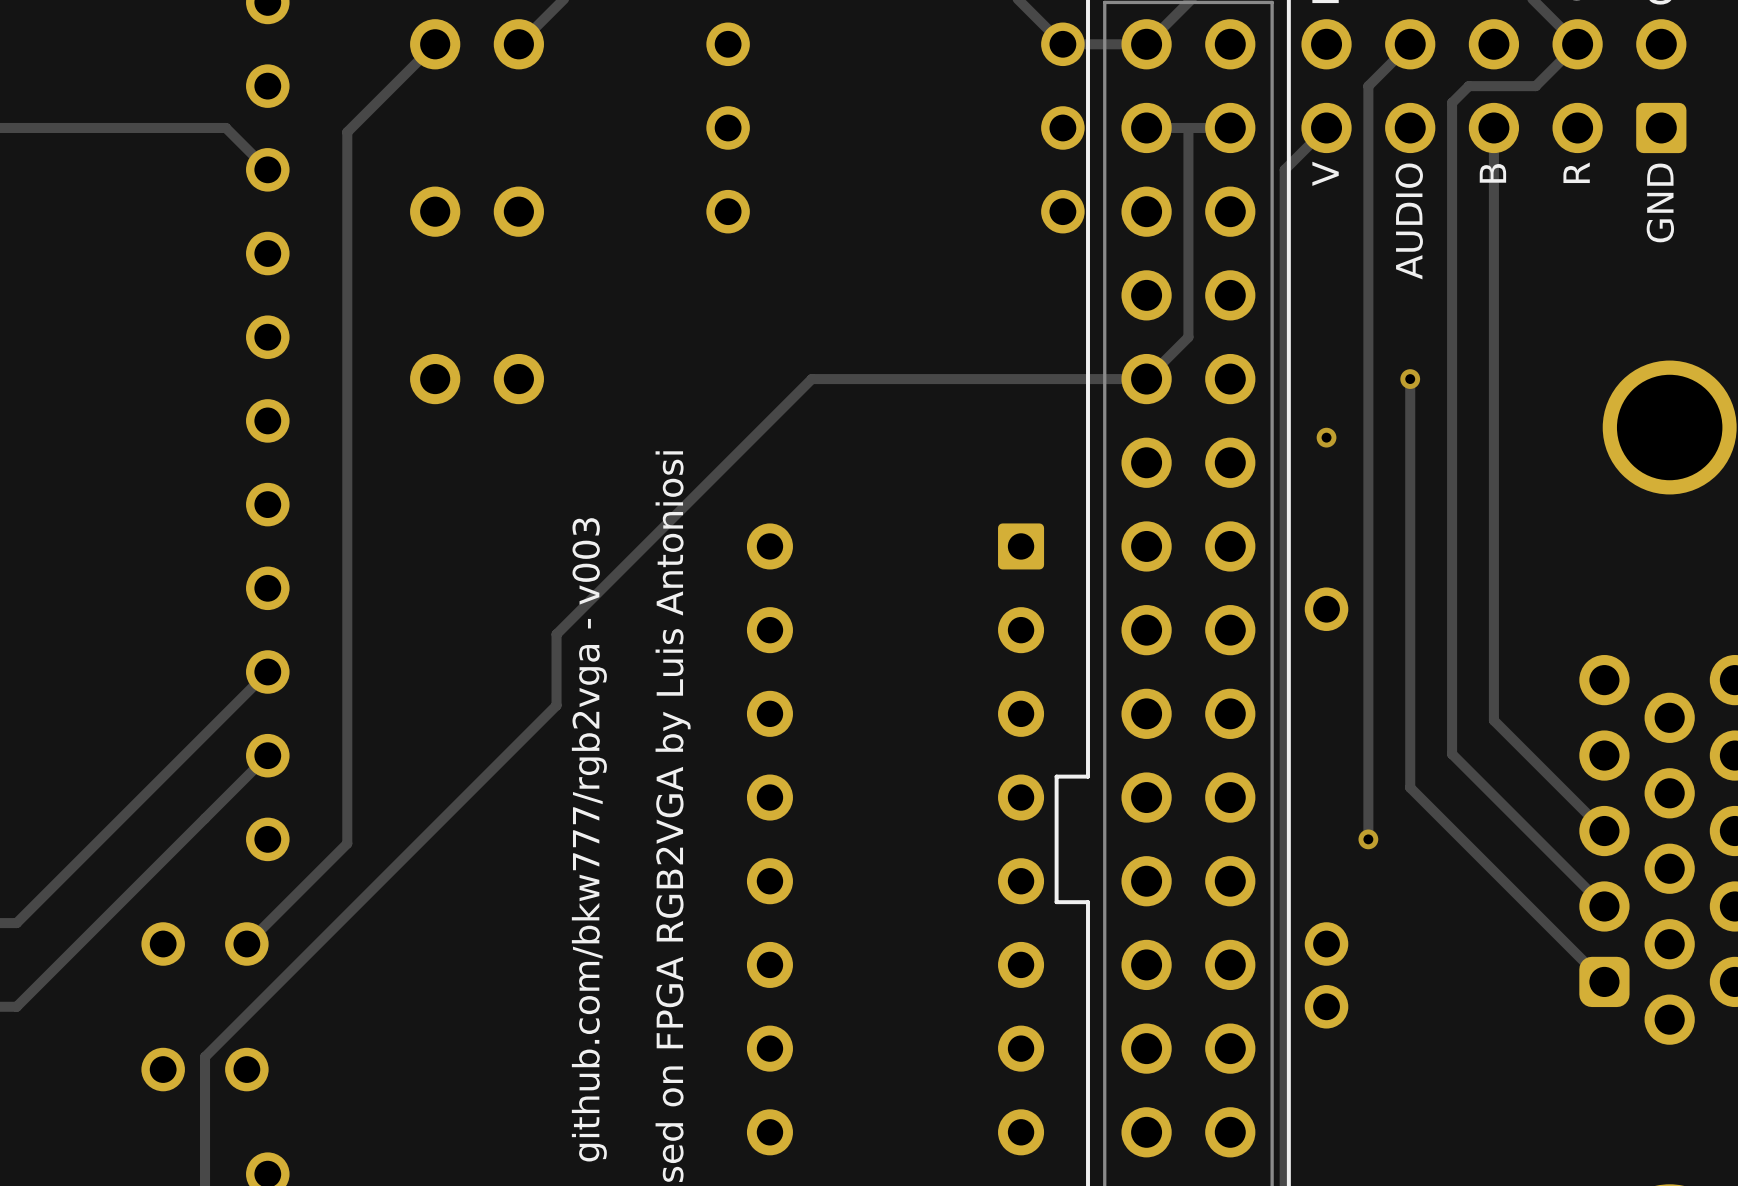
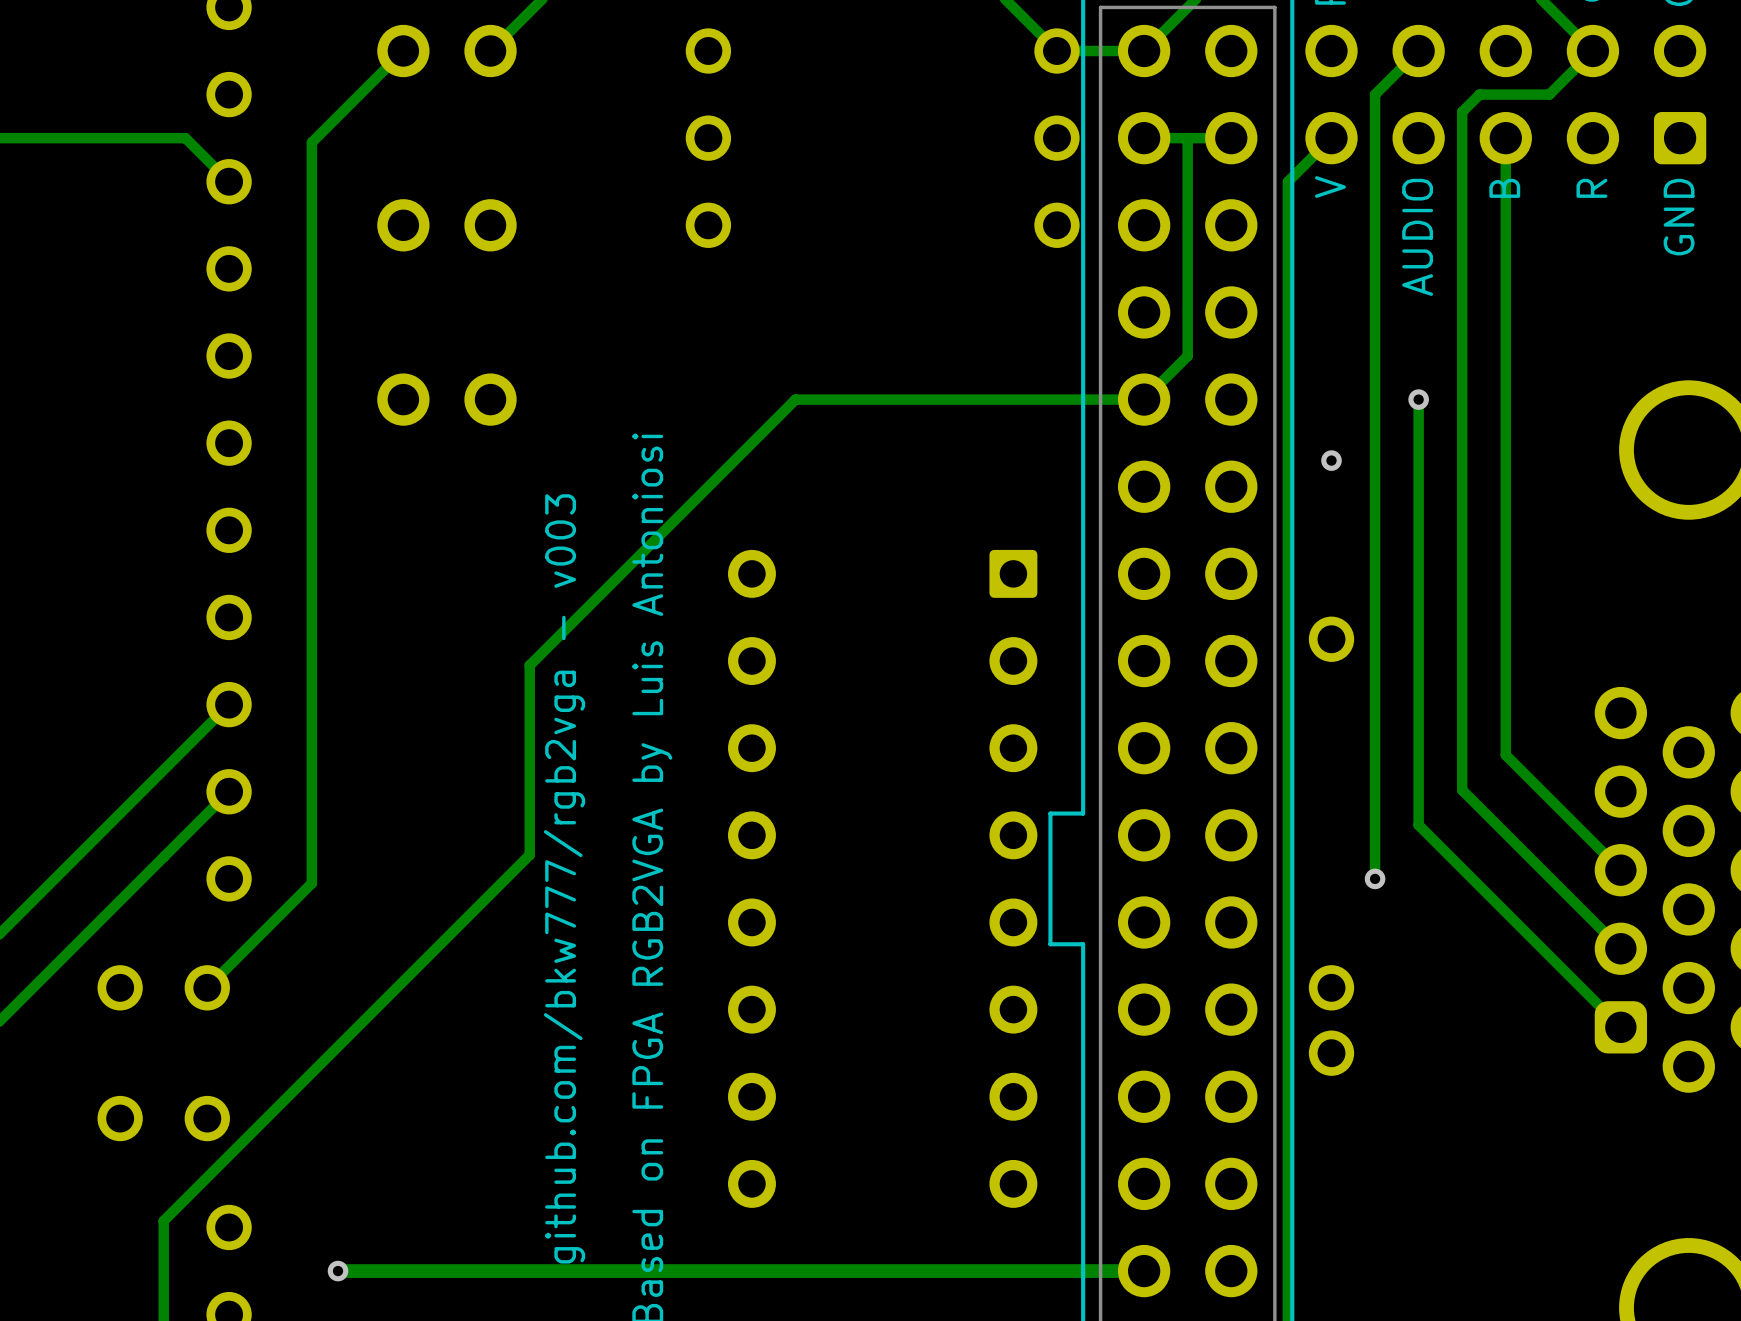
track: (556, 705) (205, 1056) (205, 1167) -> (529, 739) (529, 854) (163, 1220)

